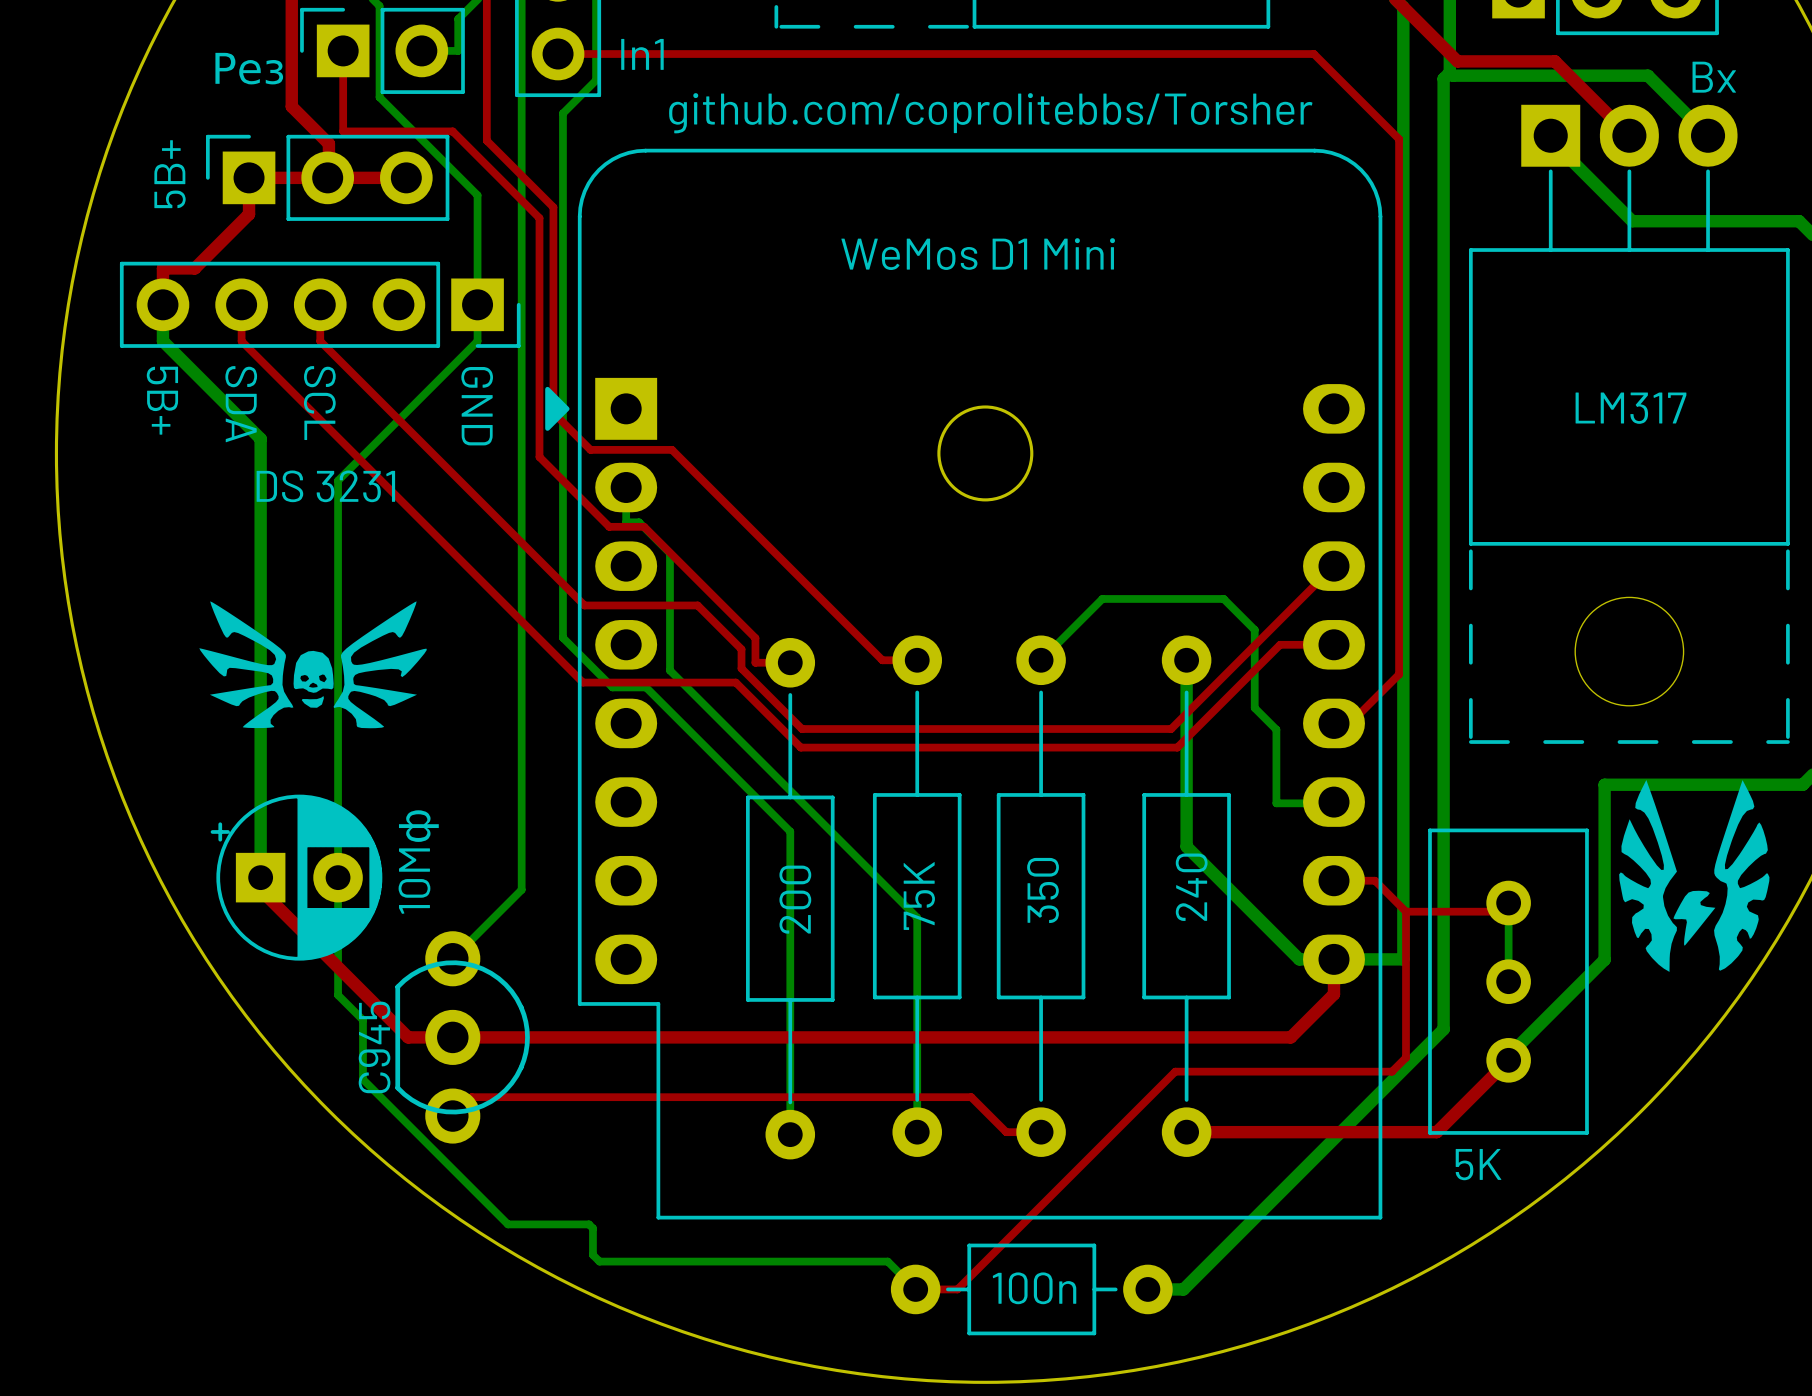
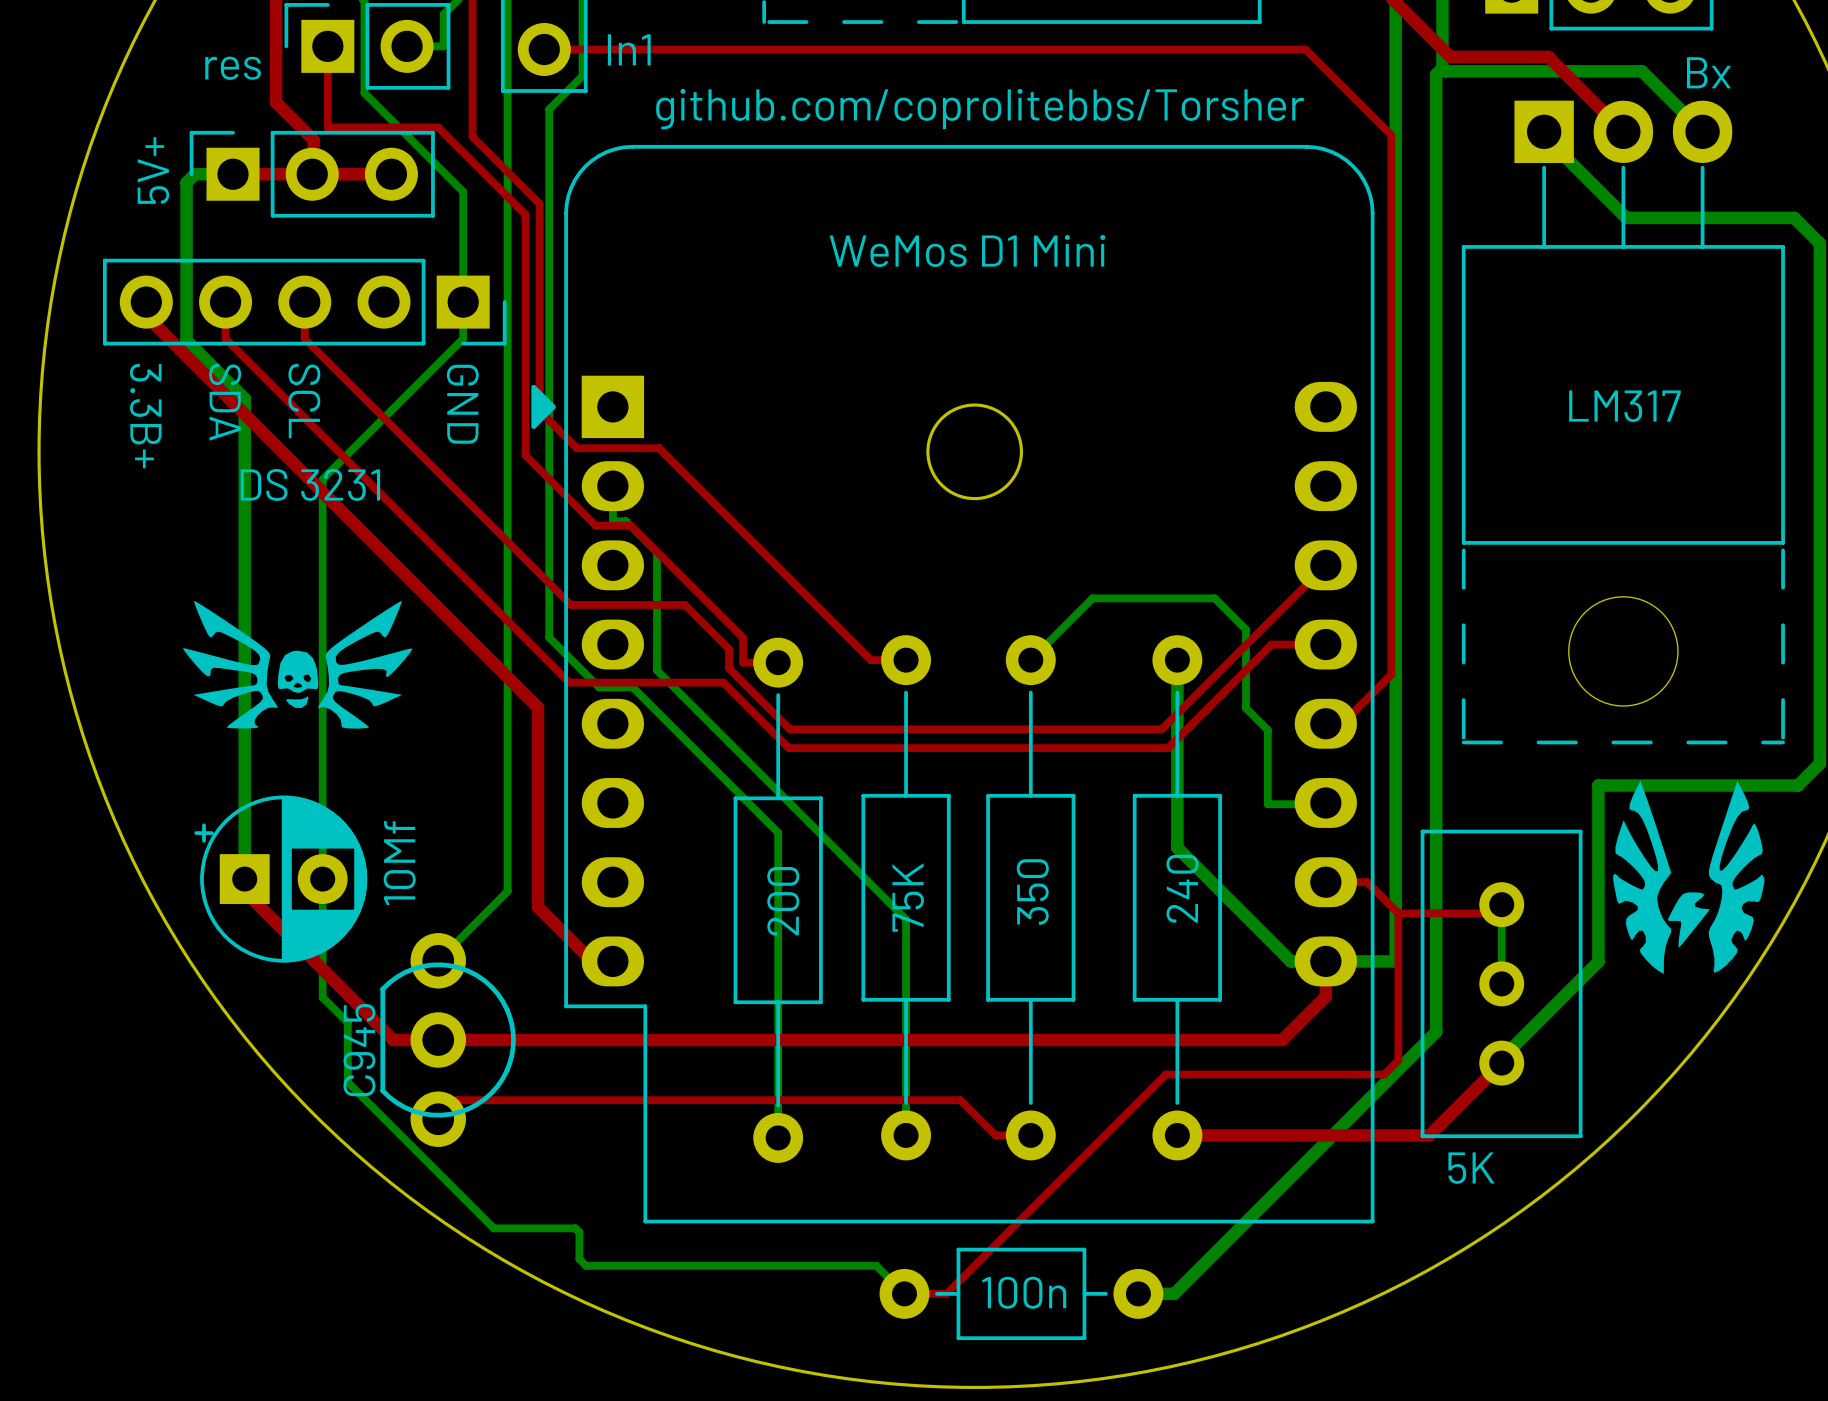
part value: Рез (249, 68) -> res (233, 68)
part value: 5B+ (170, 174) -> 5V+ (153, 170)
top track: (249, 196) (249, 214) (194, 268) (162, 268) (162, 304) -> (612, 961) (592, 961) (538, 907) (538, 707) (146, 315) (146, 302)
bottom track: (162, 304) (162, 341) (260, 438) -> (233, 174) (194, 174) (186, 182) (186, 340) (244, 398) (244, 437)
part text: 5B+ (162, 400) -> 3.3B+ (145, 416)
part value: 10Mф (418, 862) -> 10Mf (399, 863)

